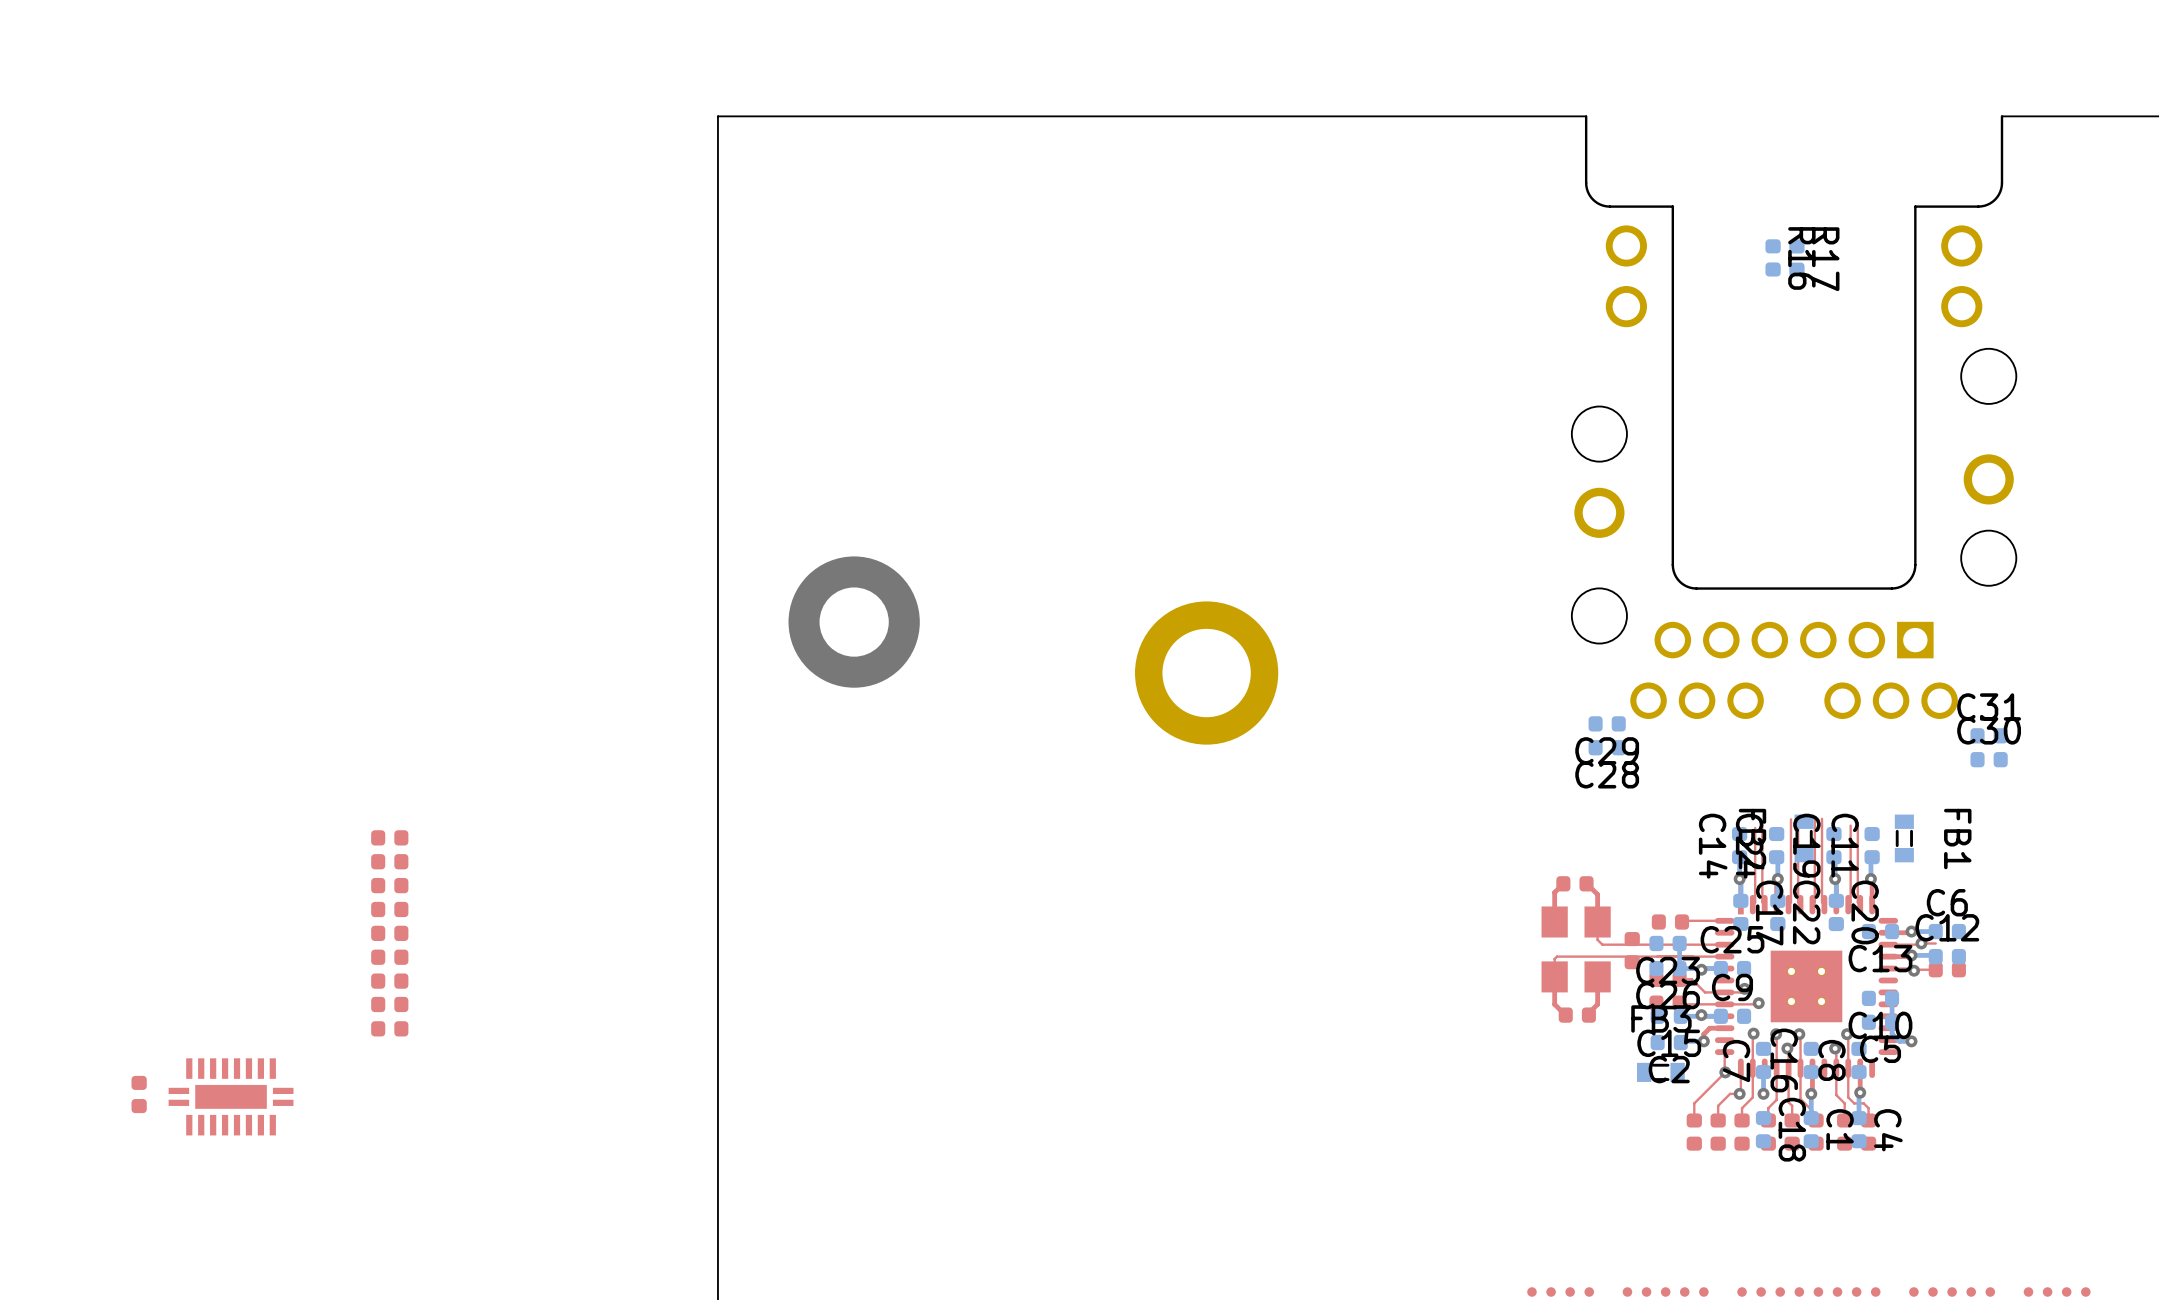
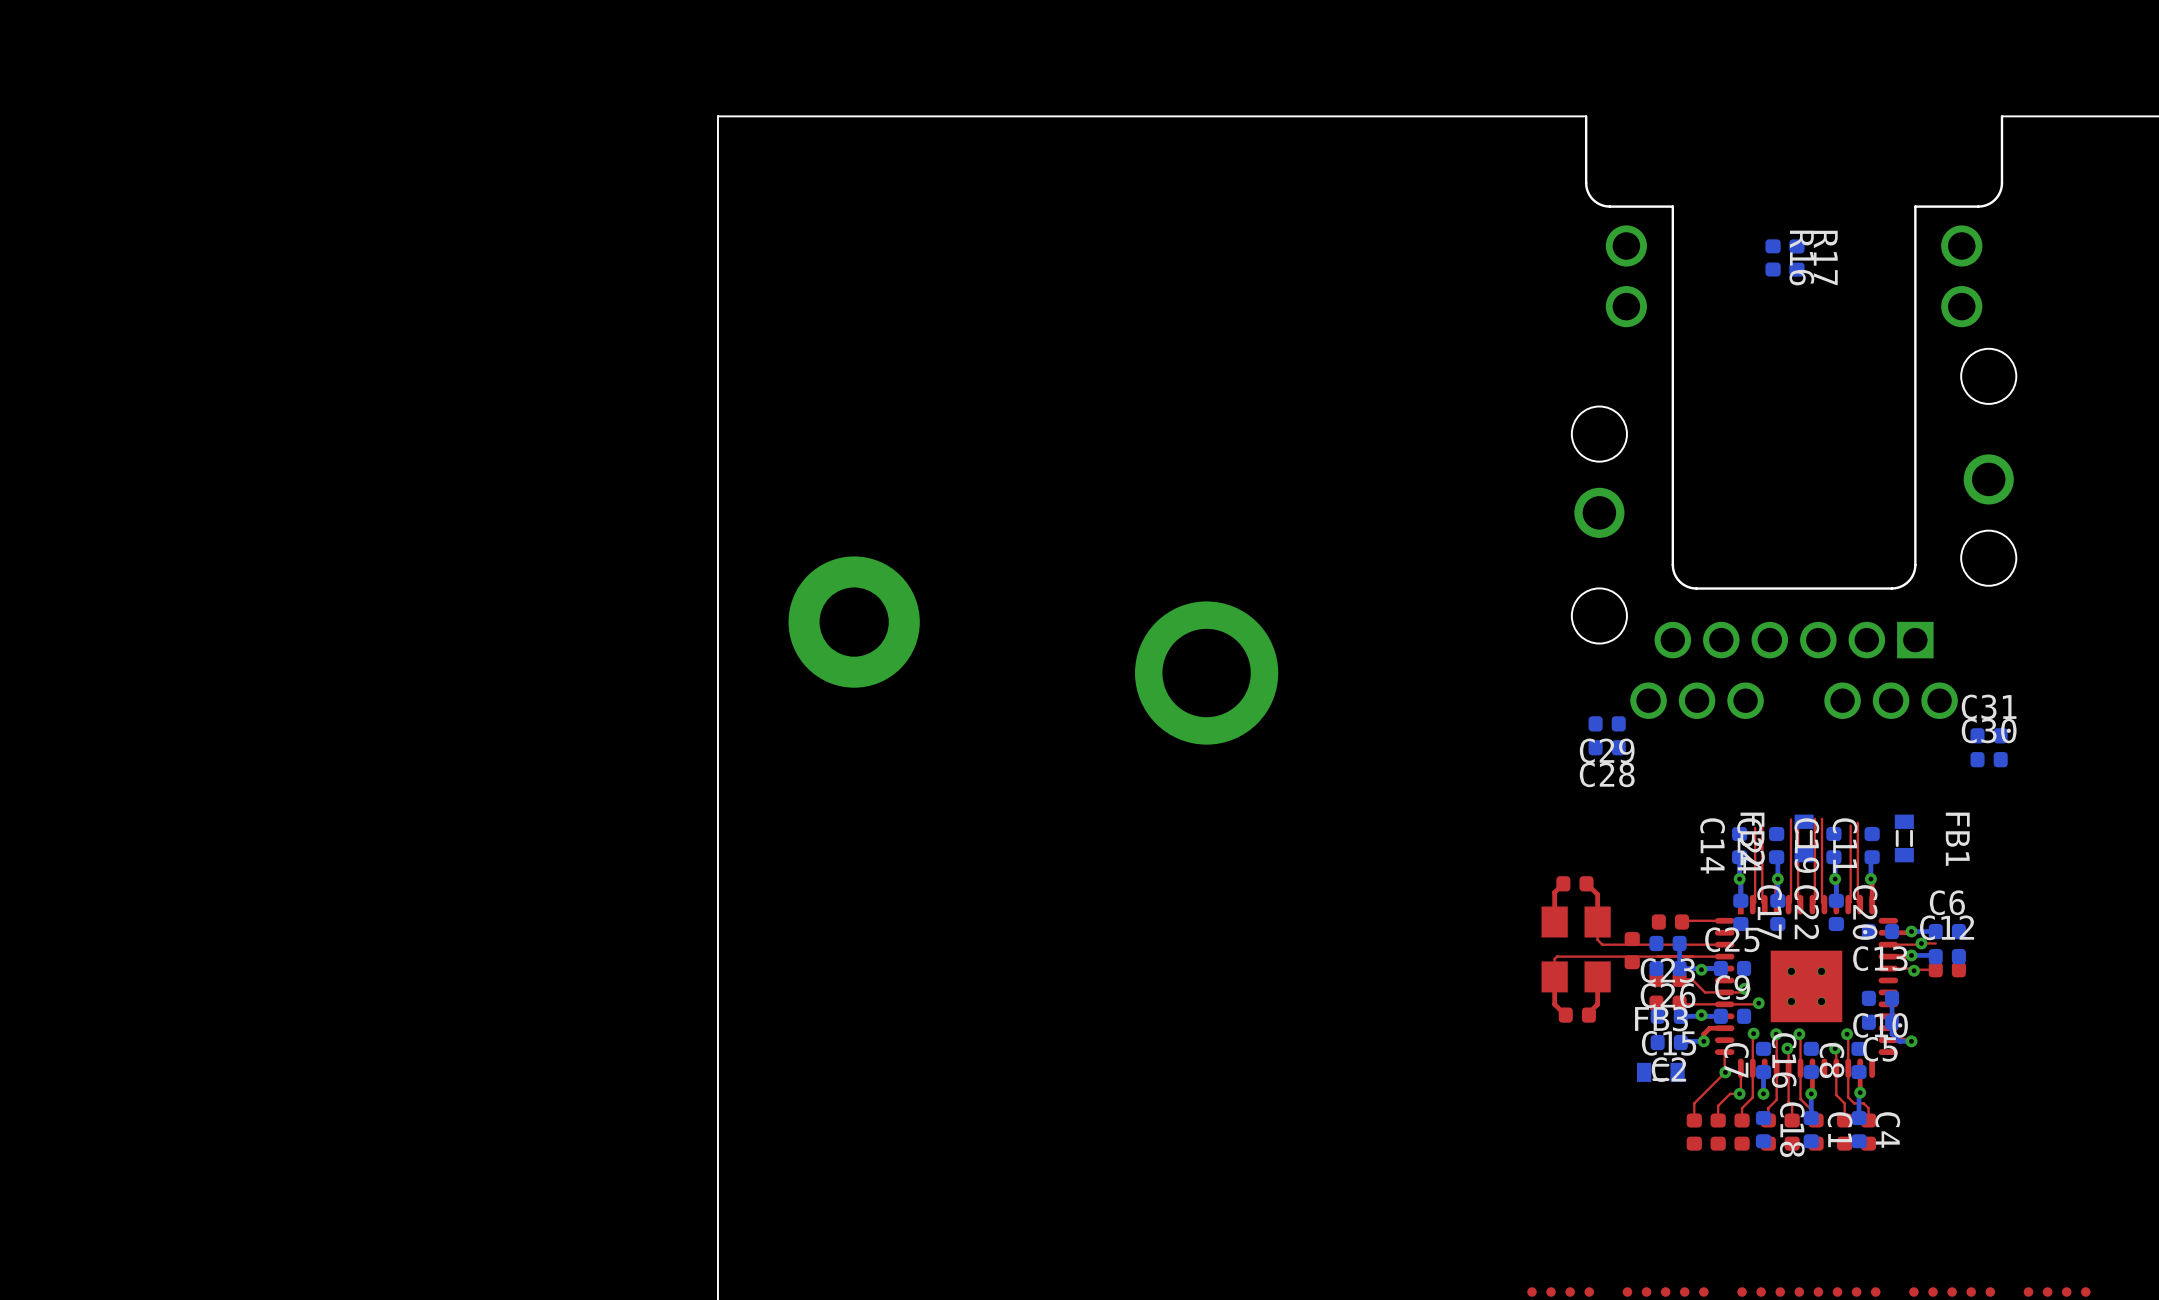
part: (389, 837) -> none
part: (389, 861) -> none
part: (389, 885) -> none
part: (389, 909) -> none
part: (389, 933) -> none
part: (389, 957) -> none
part: (389, 981) -> none
part: (389, 1004) -> none
part: (389, 1028) -> none
part: (139, 1094) -> none
part: (231, 1096) -> none

